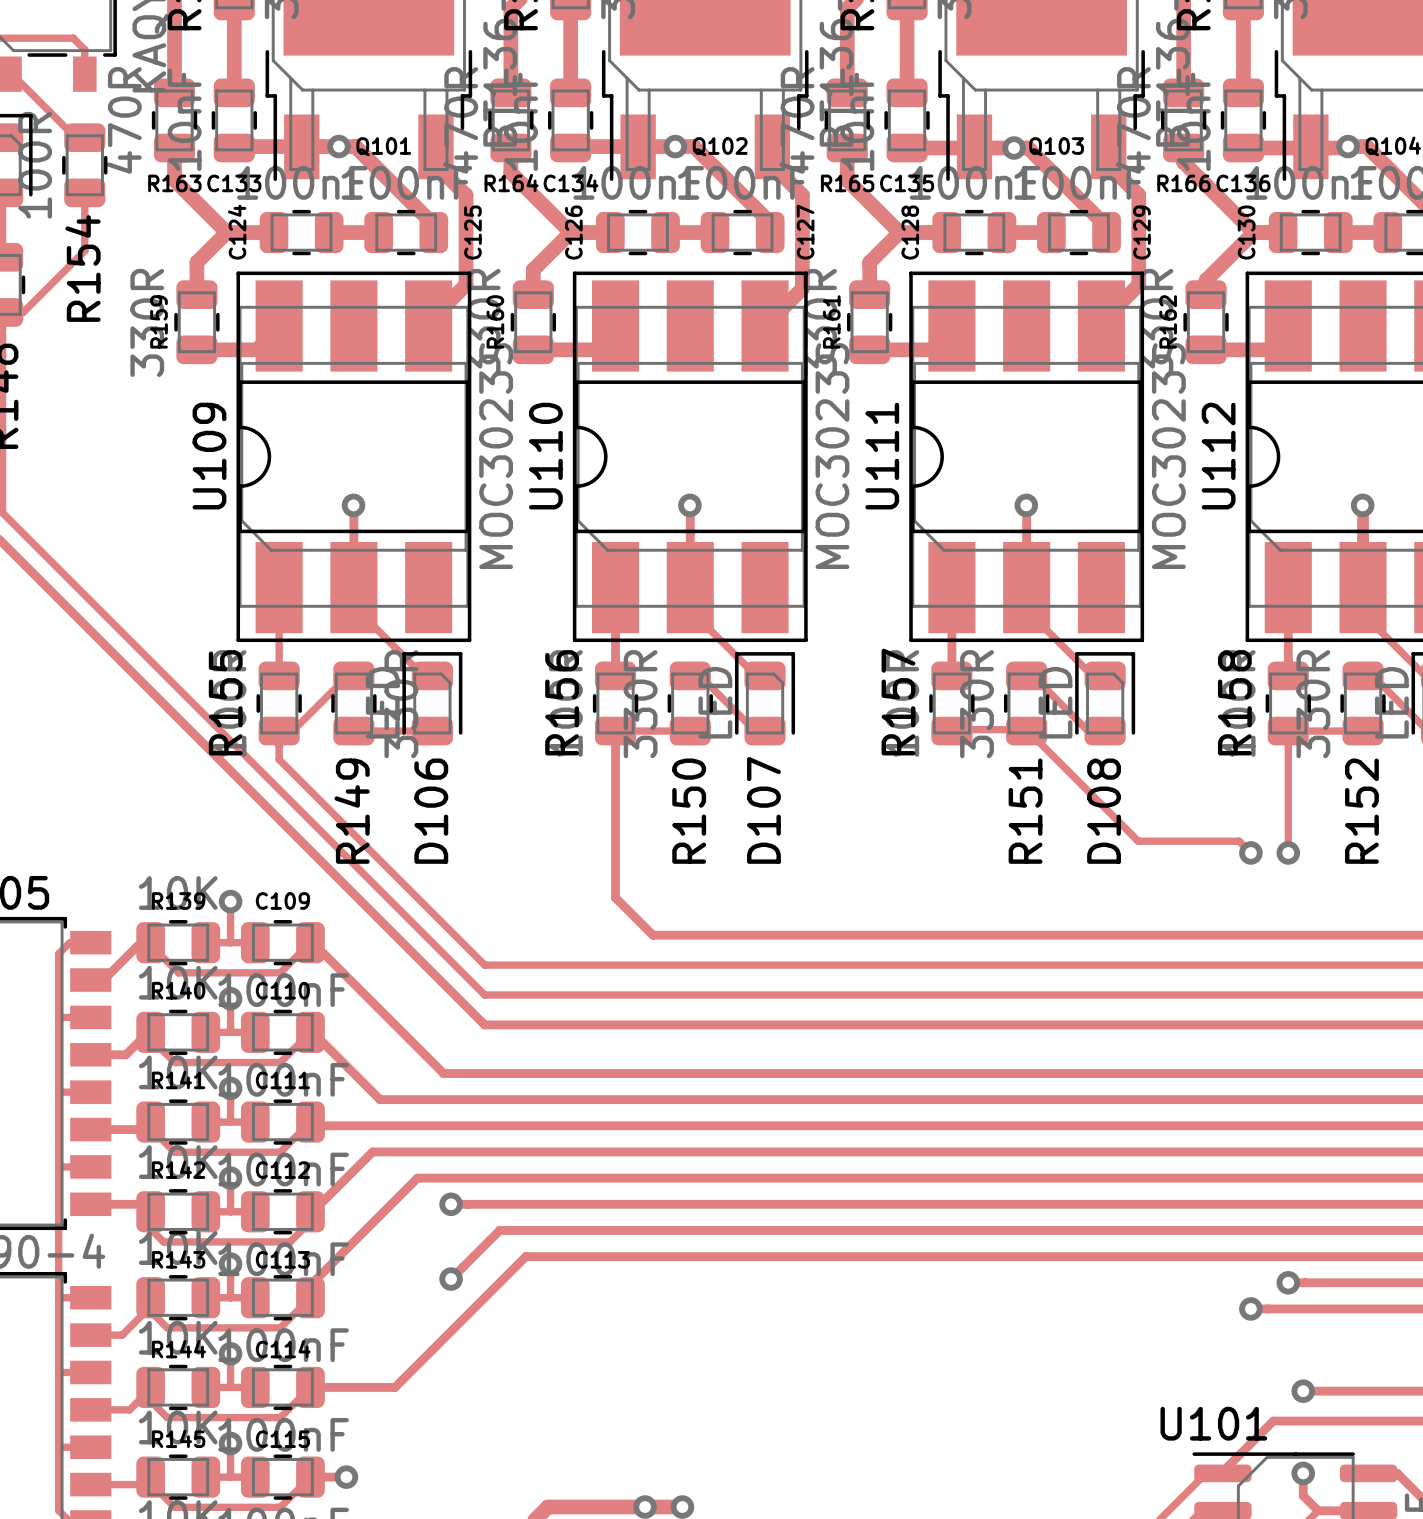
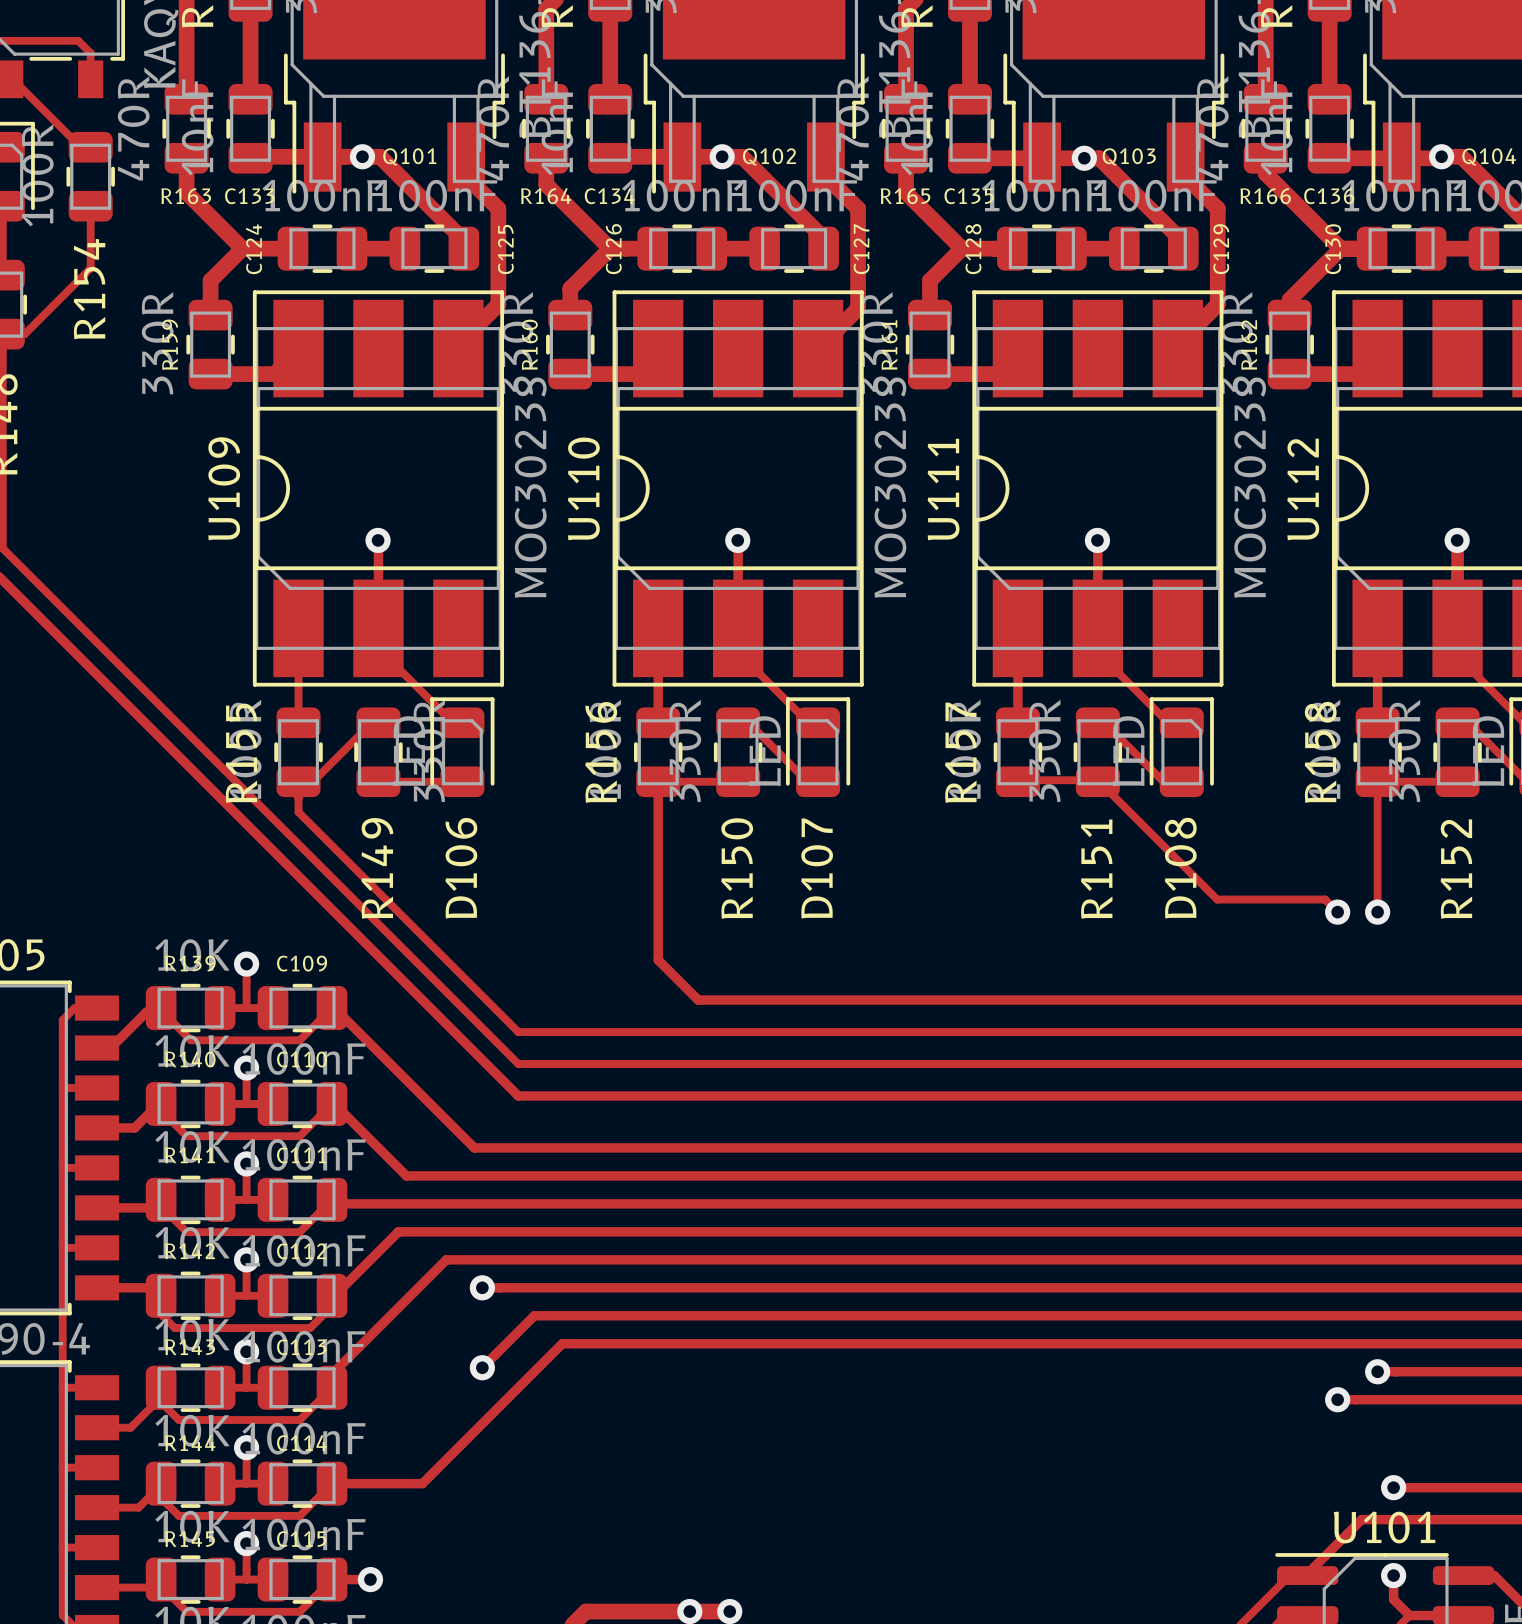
U101 name position: U101 (1213, 1423) -> U101 (1384, 1527)

